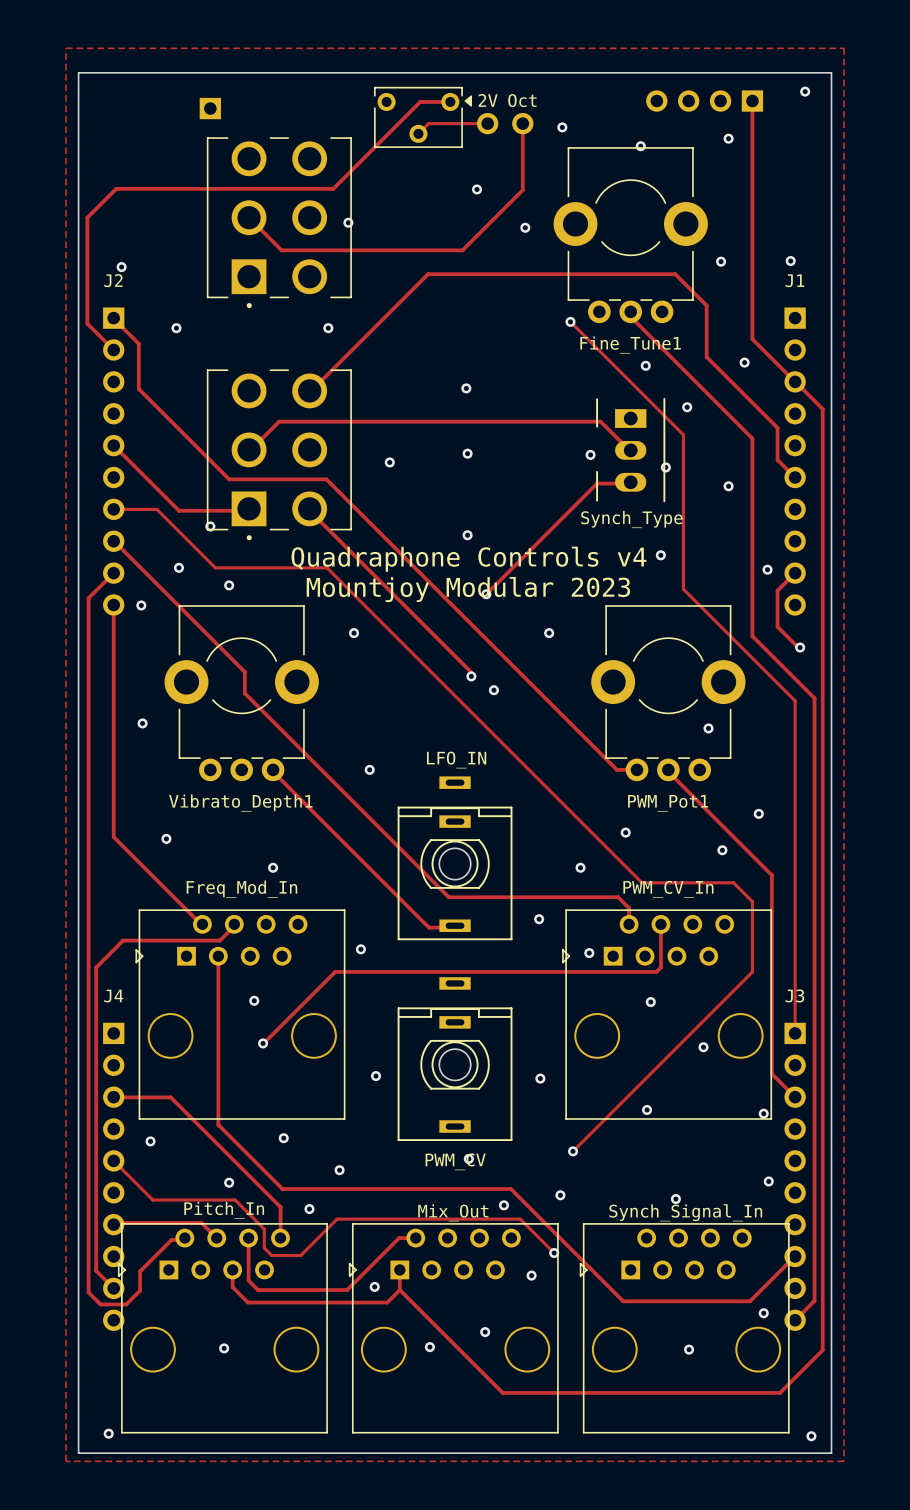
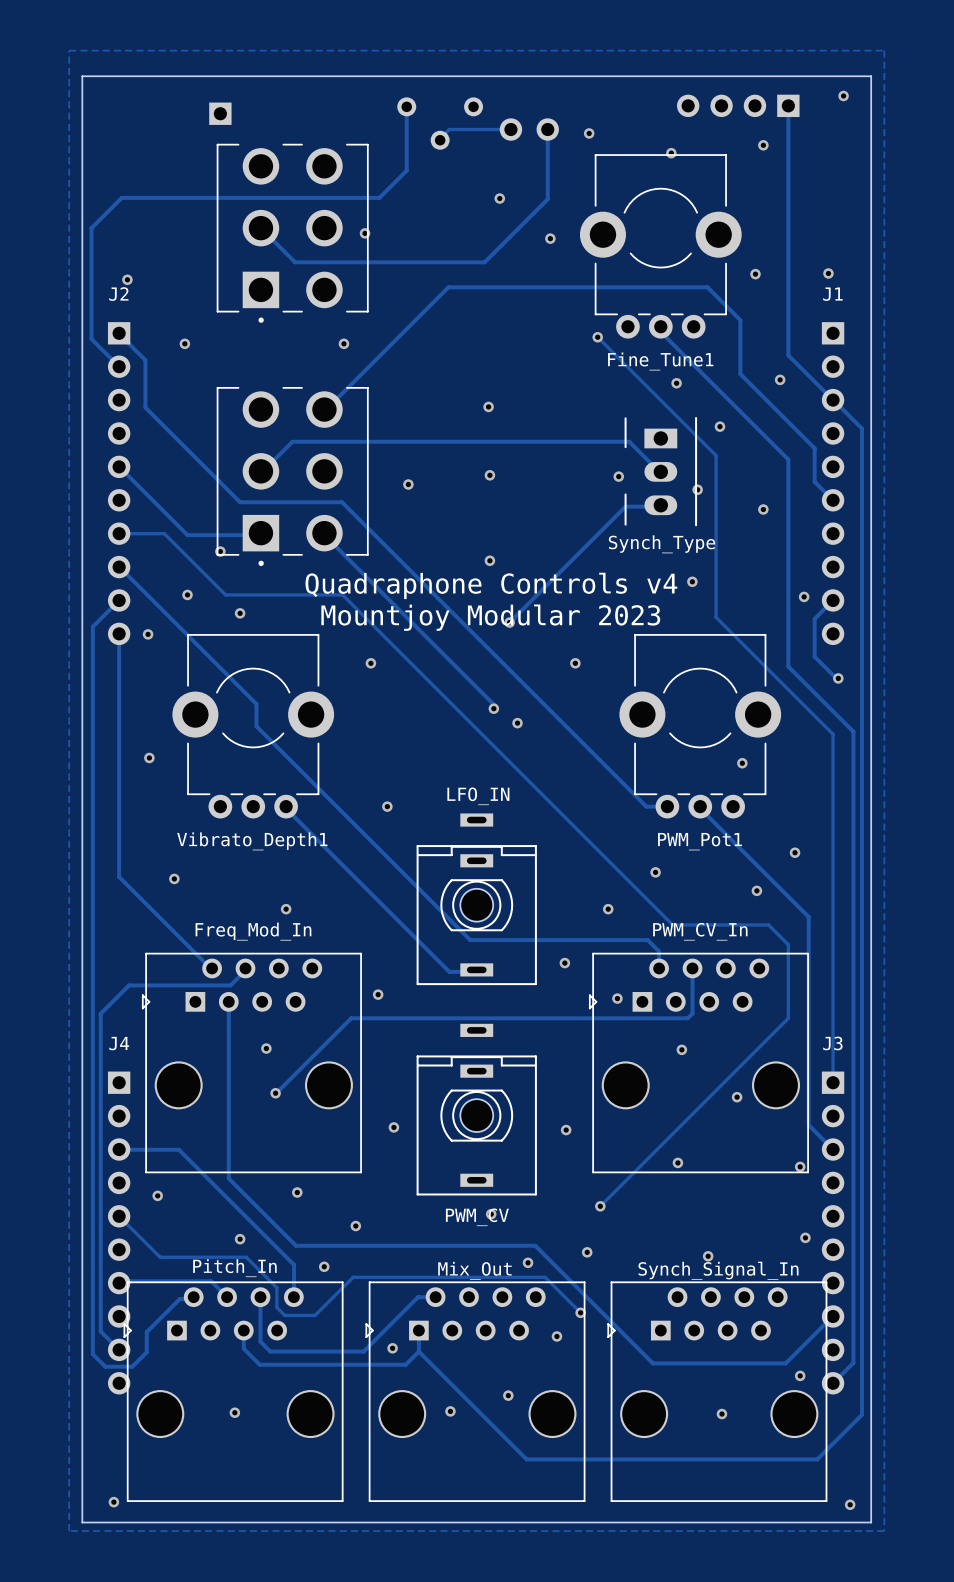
drawing: [464, 95, 472, 107] -> none
part text: 2V (488, 100) -> none
part text: Oct (522, 100) -> none
track: (450, 101) (420, 101) (333, 188) -> (406, 106) (406, 170) (379, 197) (349, 197)
part side: top (418, 117) -> bottom (440, 123)

